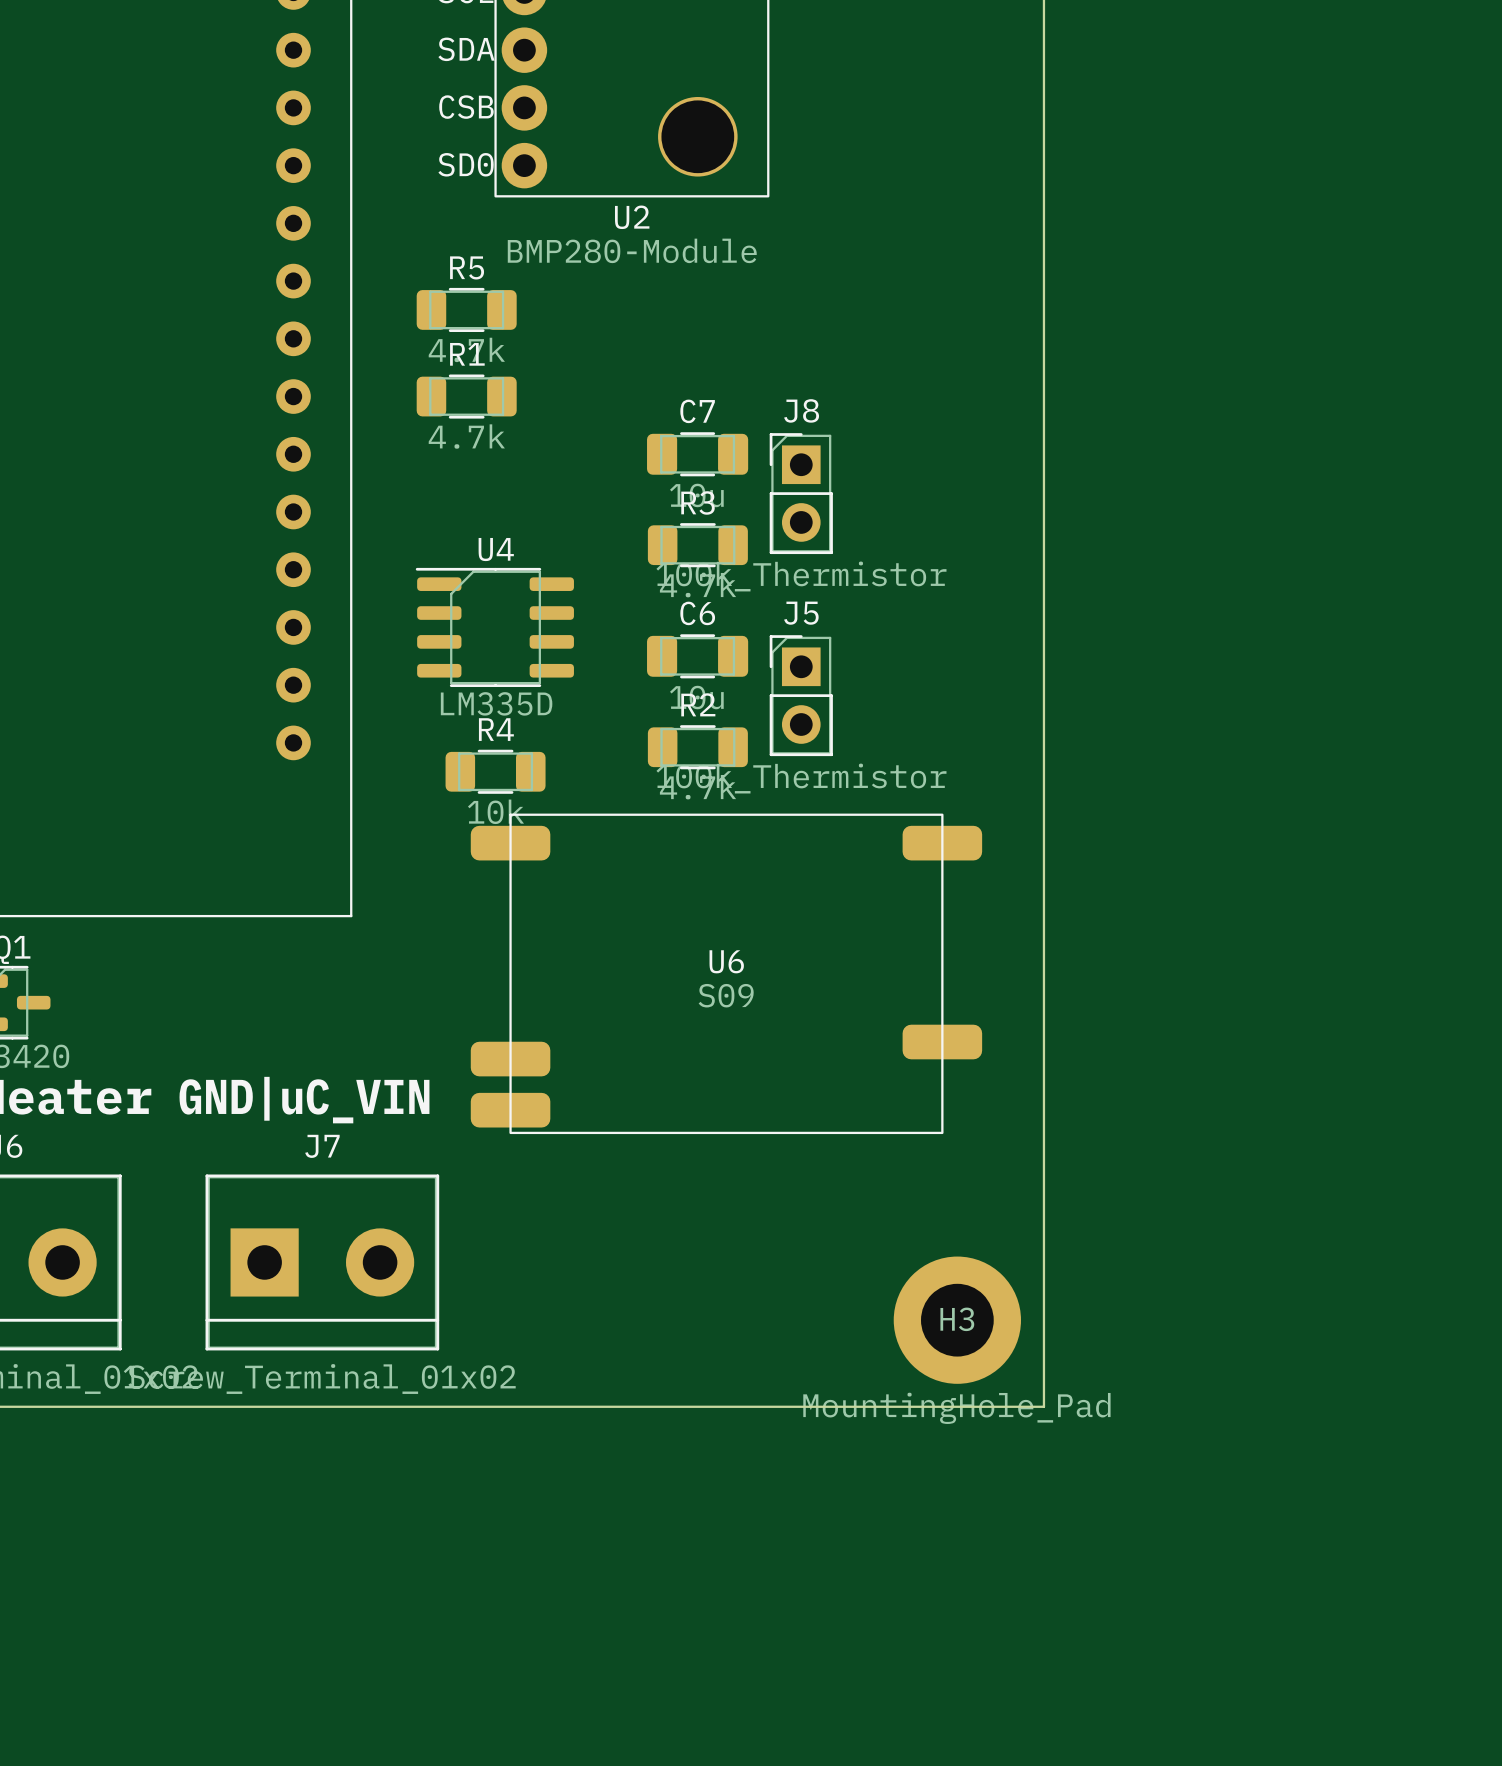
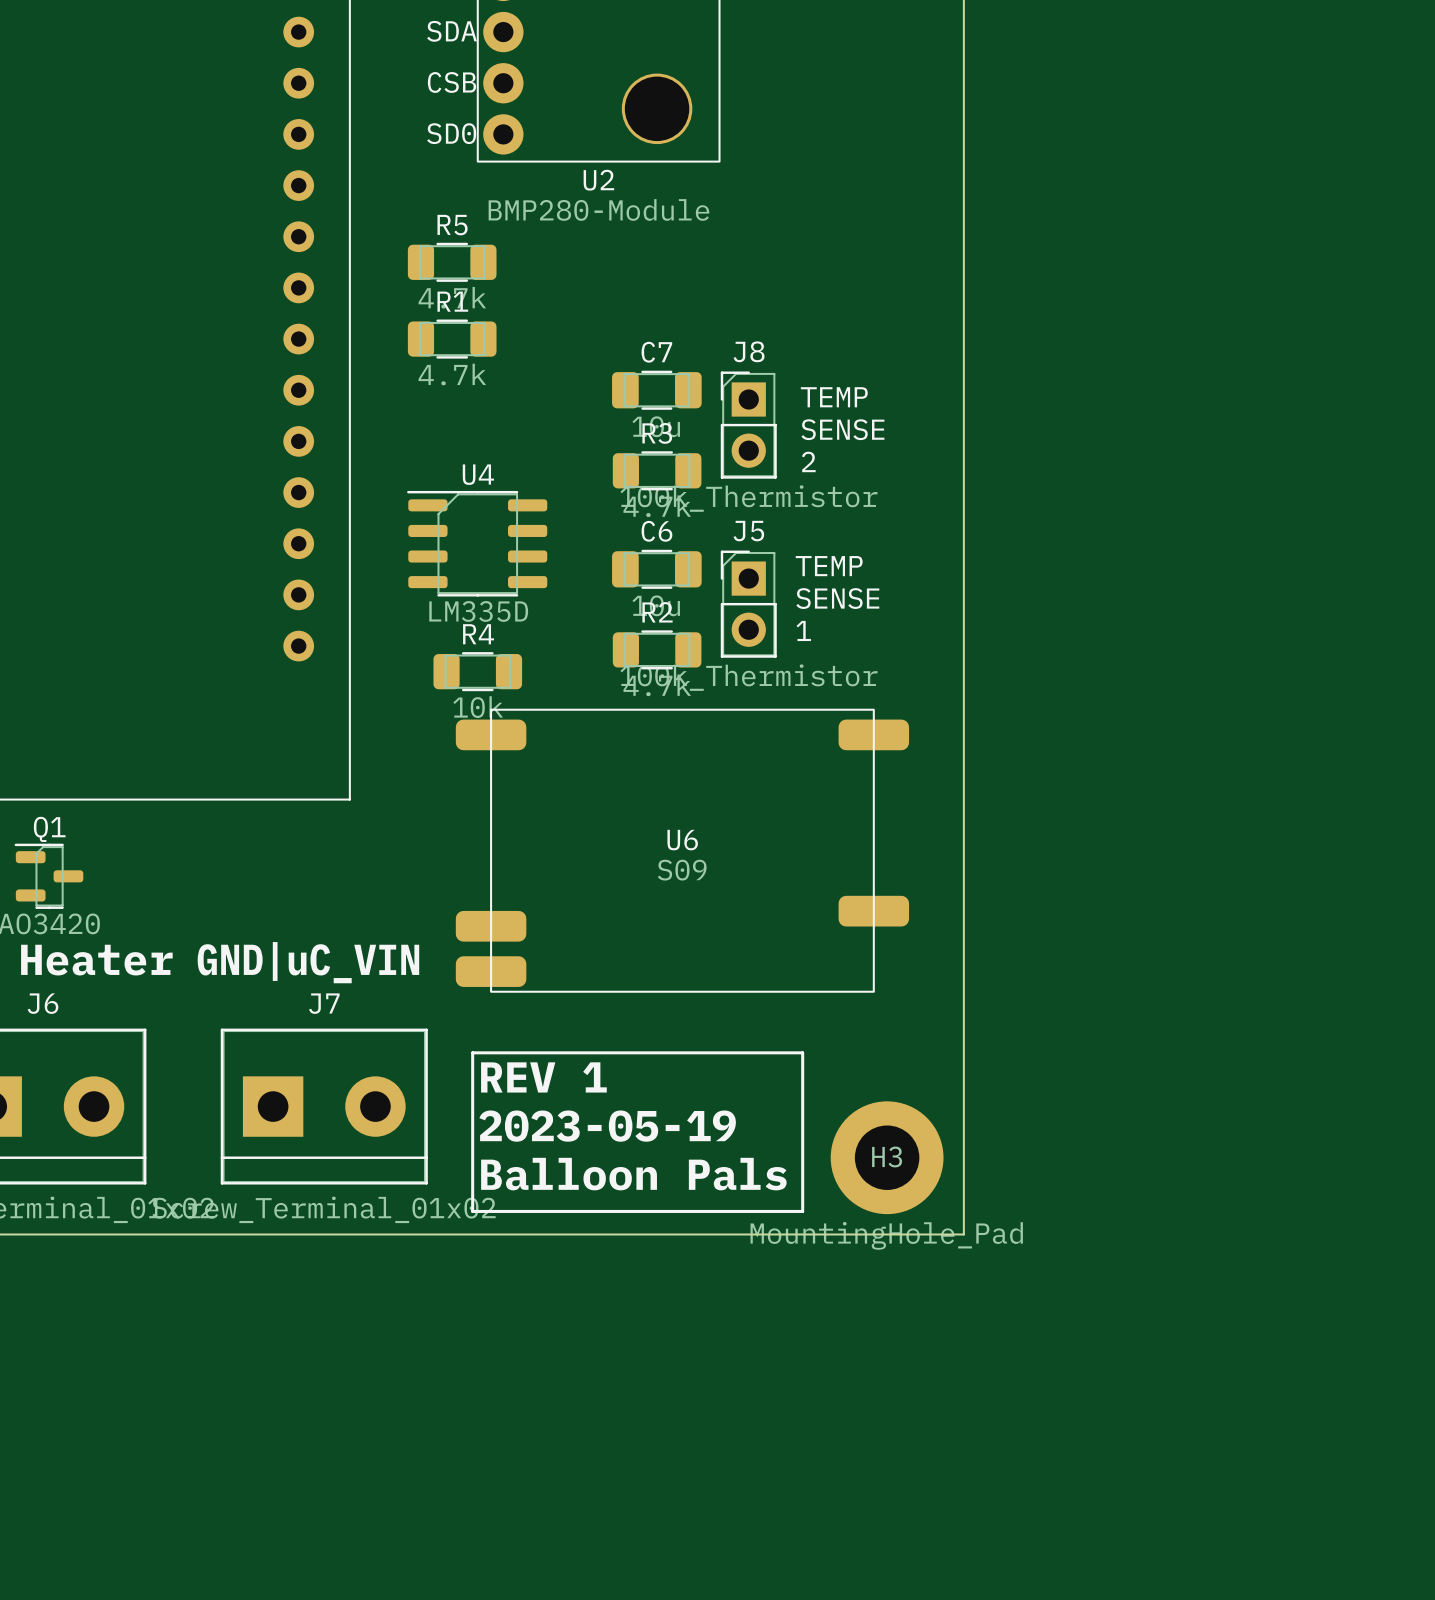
text: none -> TEMP (834, 397)
text: none -> SENSE (842, 429)
text: none -> 2 (808, 461)
text: none -> TEMP (829, 566)
text: none -> SENSE (837, 598)
text: none -> 1 (803, 630)
line: none -> (472, 1052) (802, 1052) (802, 1211) (472, 1211) (472, 1052)
text: none -> REV 1 (543, 1077)
text: none -> 2023-05-19 (607, 1126)
text: none -> Balloon Pals (633, 1174)

